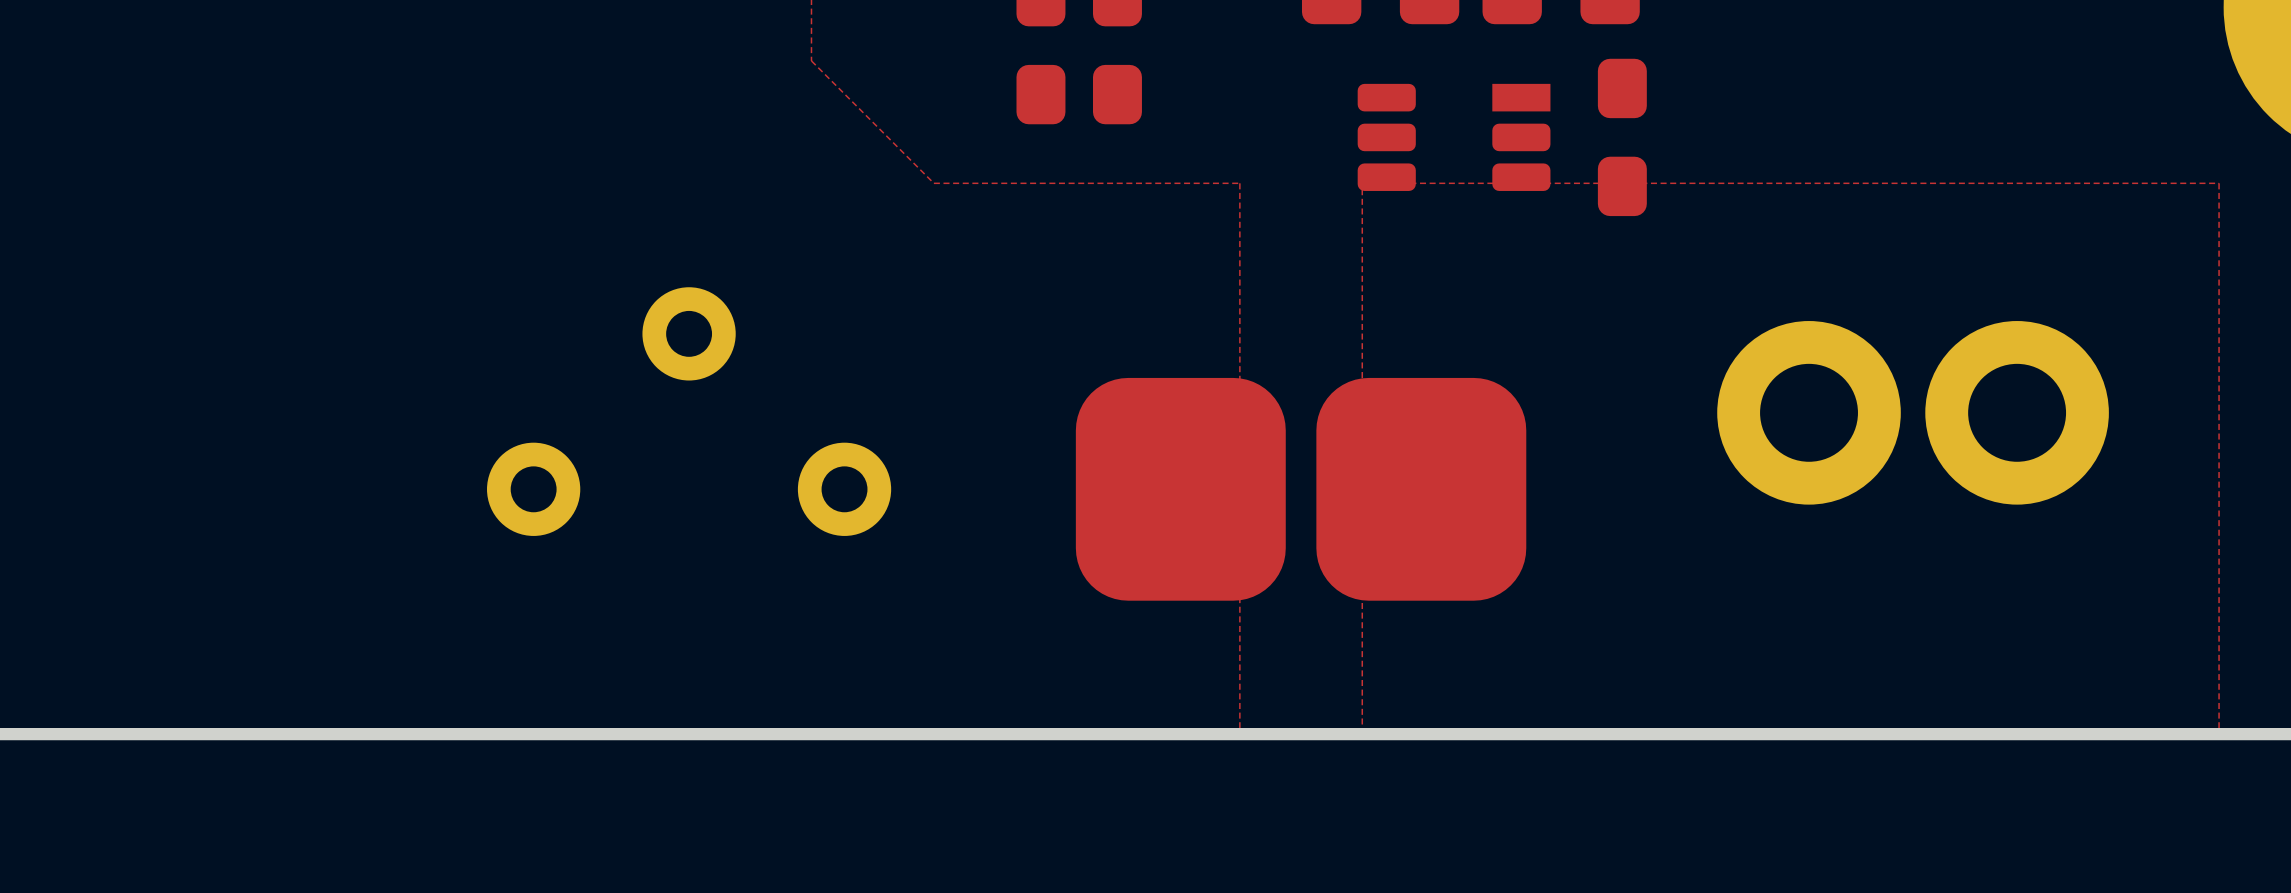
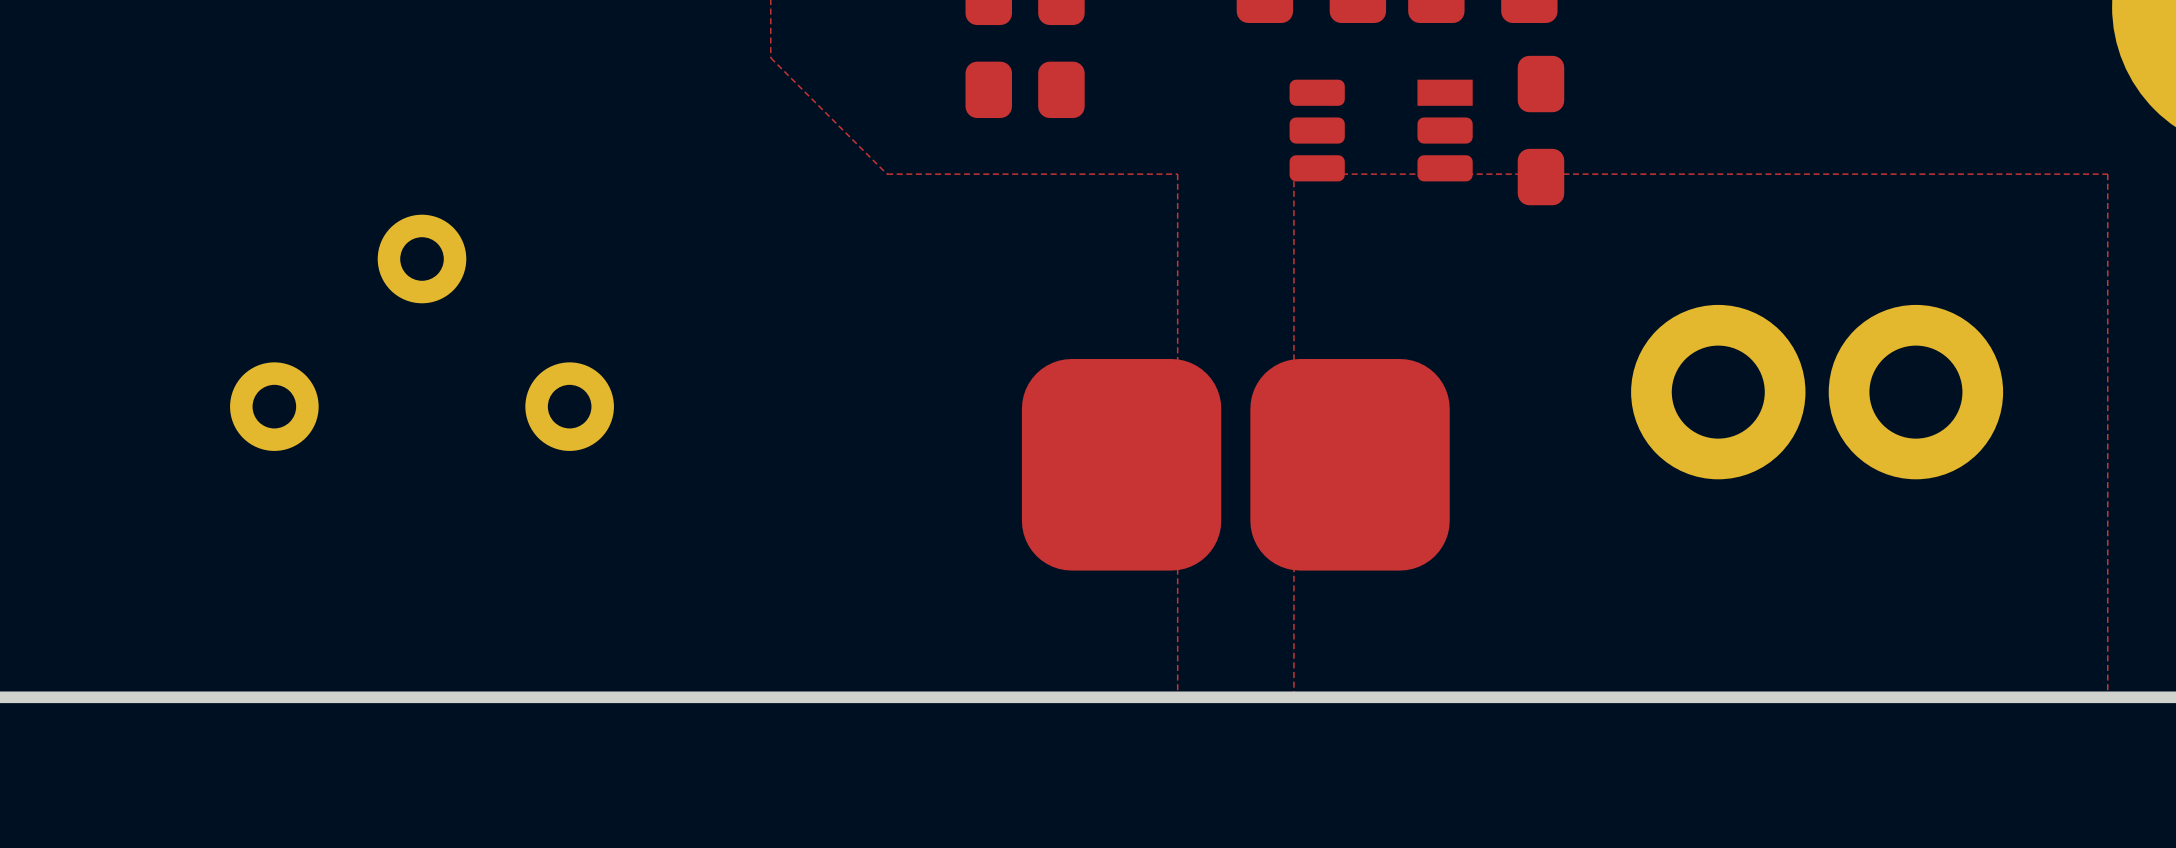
part position: (689, 411) -> (422, 332)

